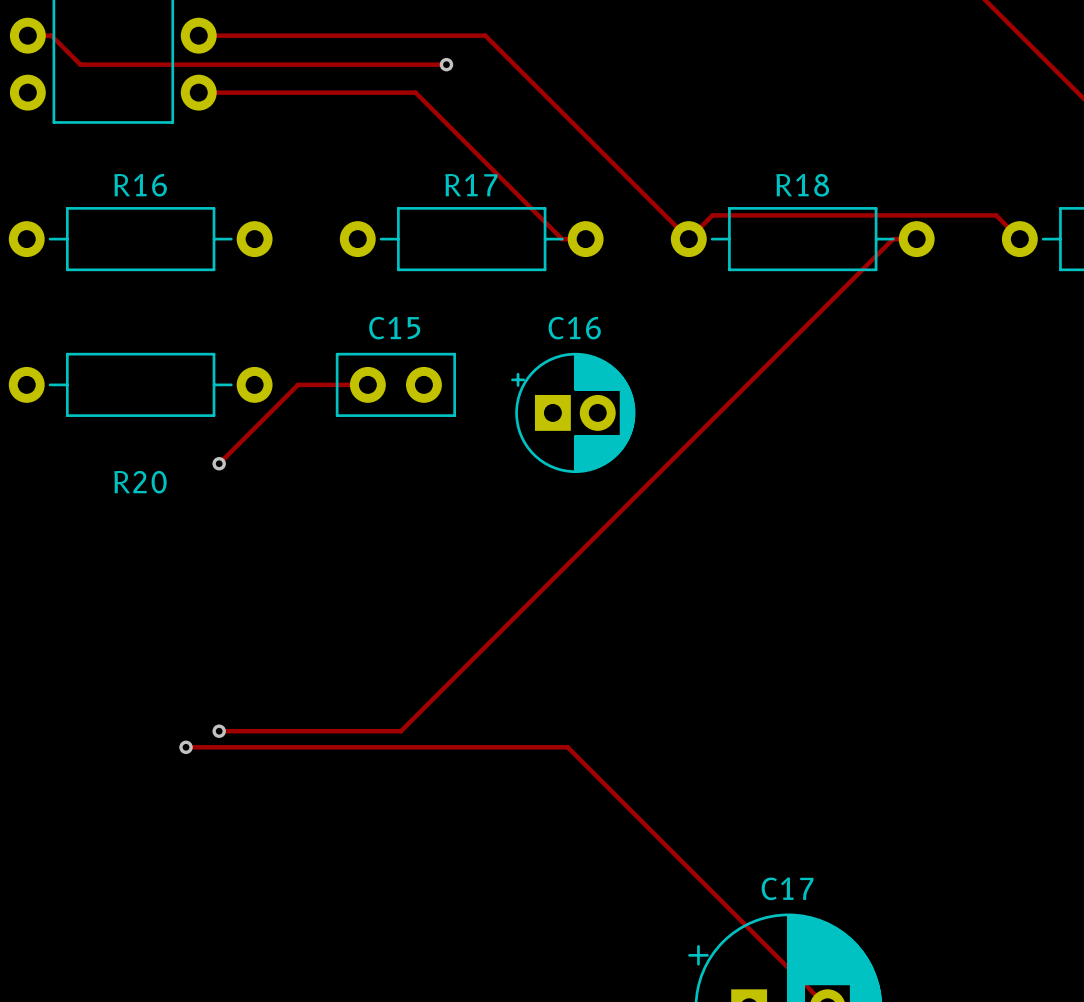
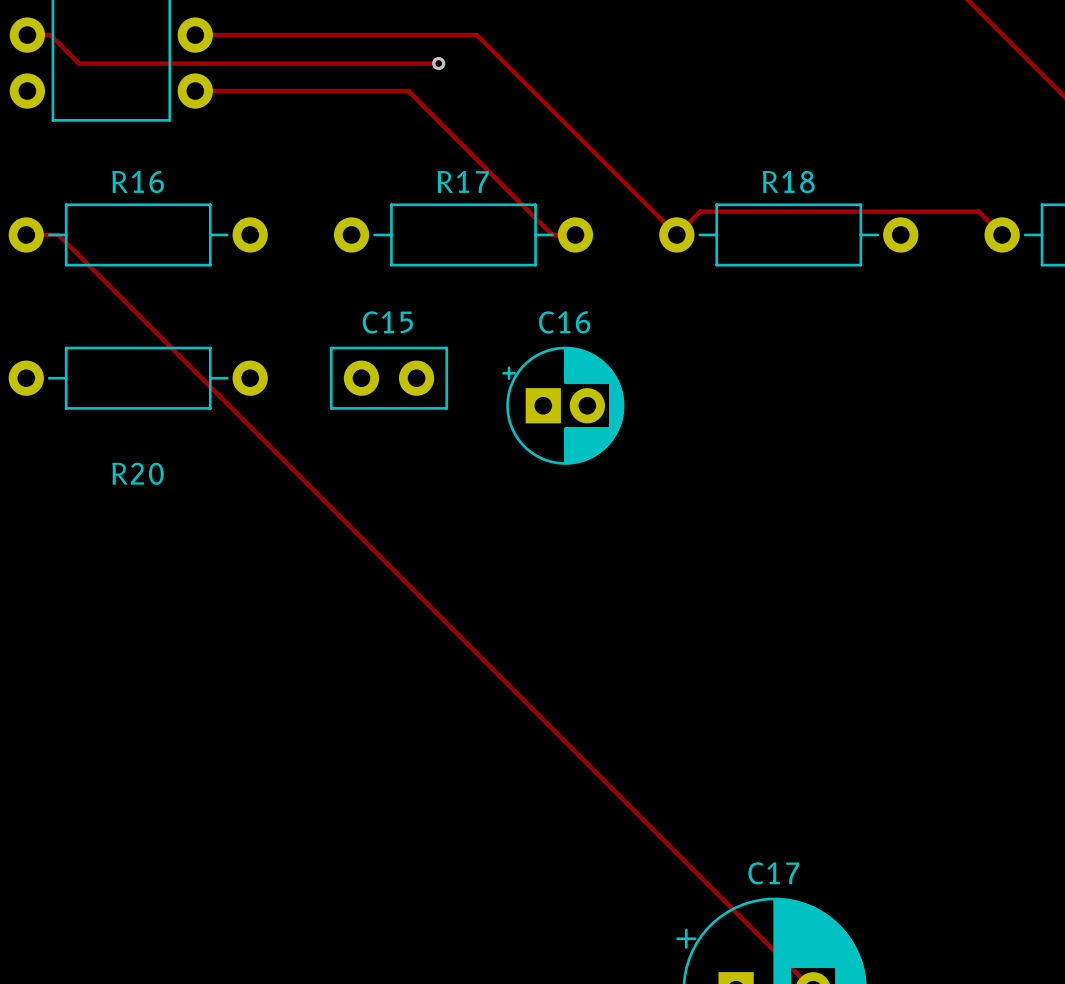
track: (916, 239) (893, 239) (400, 731) (219, 731) -> none
track: (367, 384) (298, 384) (219, 463) -> none
via: (219, 463) -> none
via: (219, 731) -> none
track: (186, 747) (567, 747) -> (26, 234) (58, 234) (557, 734)
via: (186, 747) -> none

